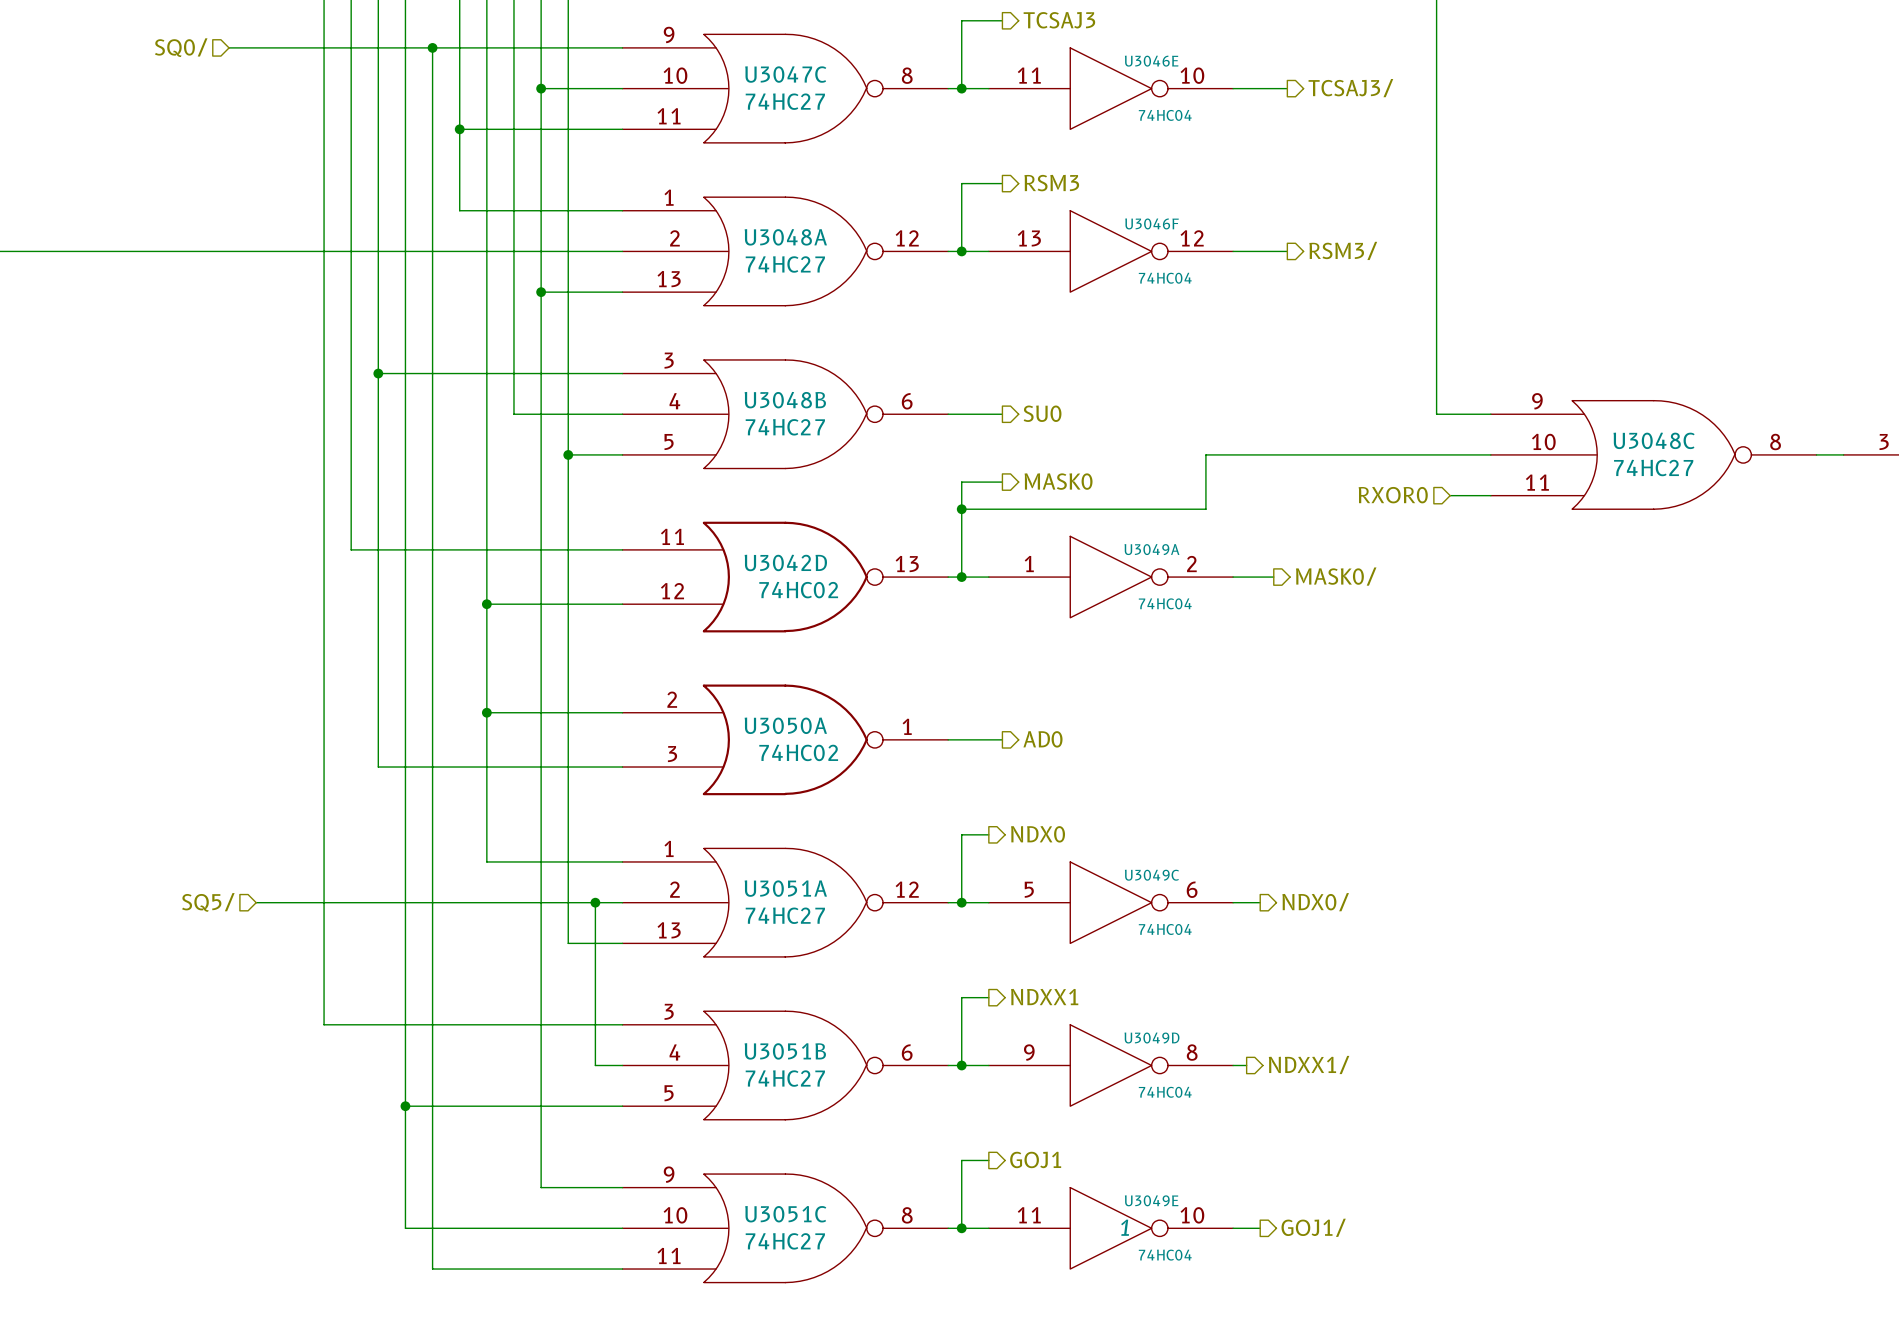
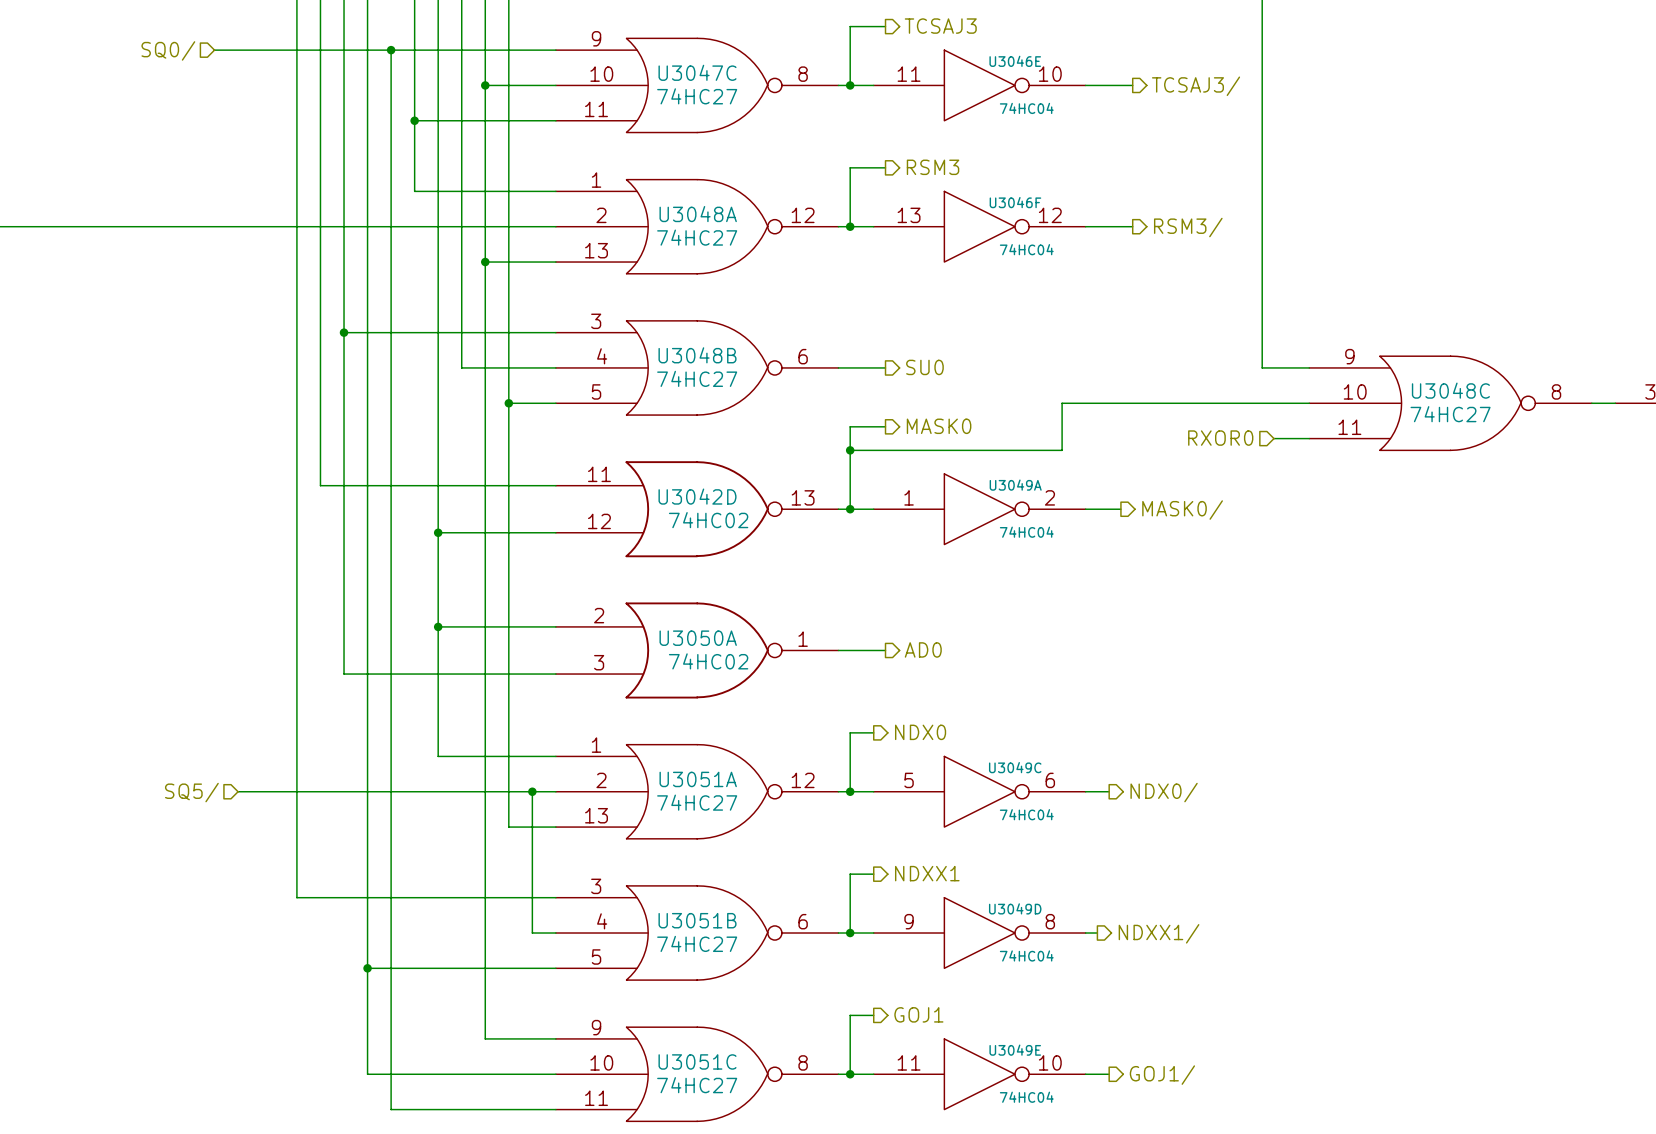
U3049E text: 1 (1125, 1227) -> none

